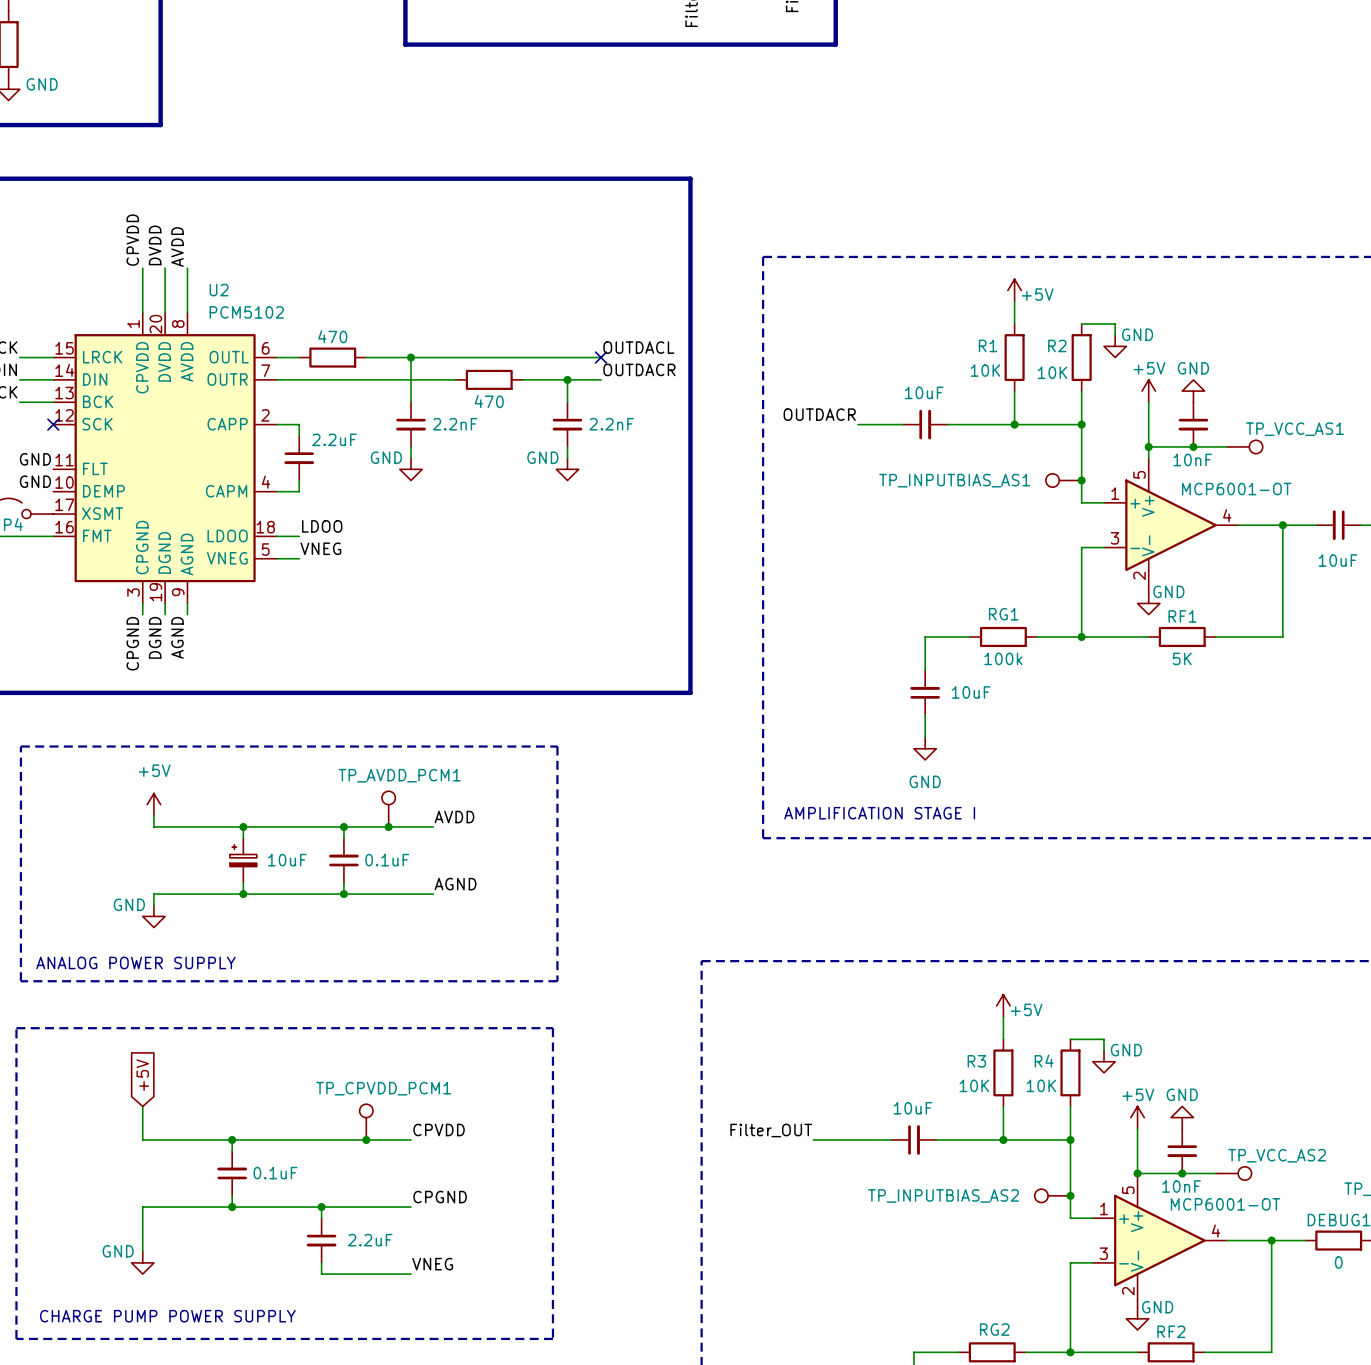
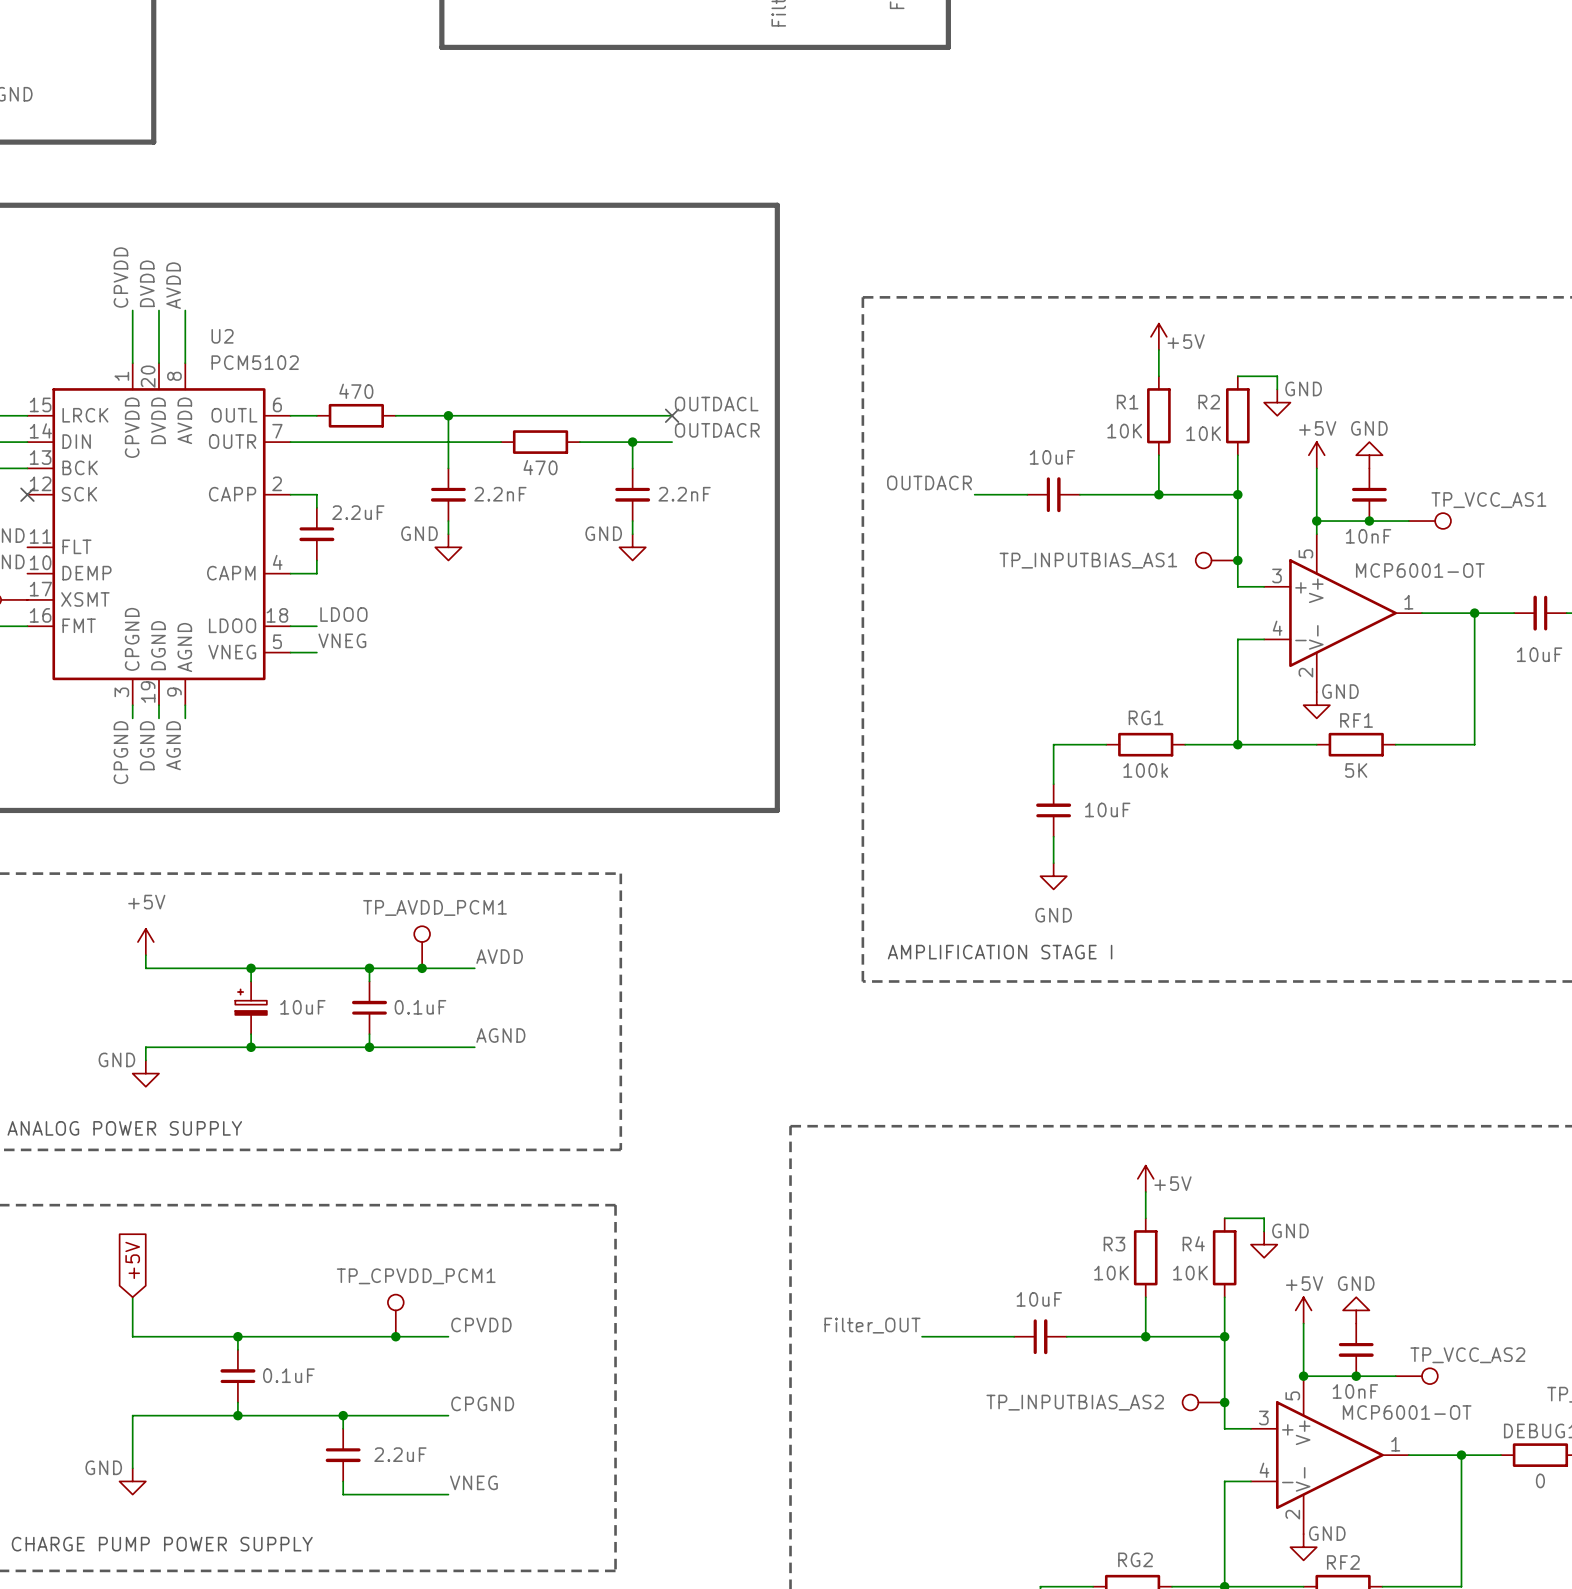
part pin number: 1 (1115, 493) -> 3 (1276, 575)
part pin number: 4 (1227, 515) -> 1 (1408, 602)
part pin number: 3 (1114, 538) -> 4 (1277, 628)
part pin number: 1 (1104, 1208) -> 3 (1263, 1417)
part pin number: 4 (1216, 1231) -> 1 (1395, 1444)
part pin number: 3 (1103, 1253) -> 4 (1264, 1470)

